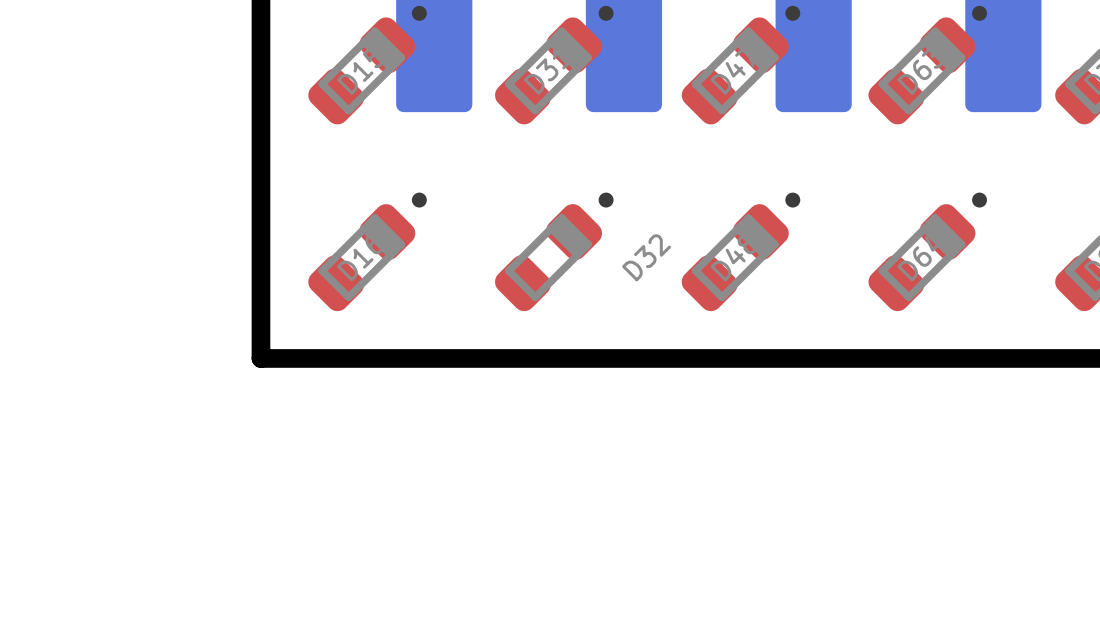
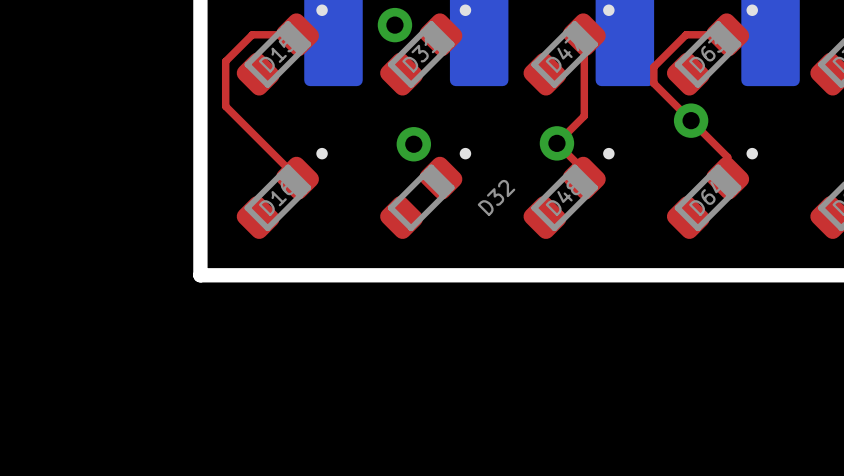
via: none -> (394, 25)
top track: none -> (297, 34) (252, 34) (225, 61) (225, 106) (297, 178)
top track: none -> (584, 34) (584, 116) (556, 143) (584, 170) (584, 178)
top track: none -> (727, 34) (686, 34) (653, 67) (653, 83) (727, 157) (727, 178)
via: none -> (691, 120)
via: none -> (556, 143)
via: none -> (413, 144)

